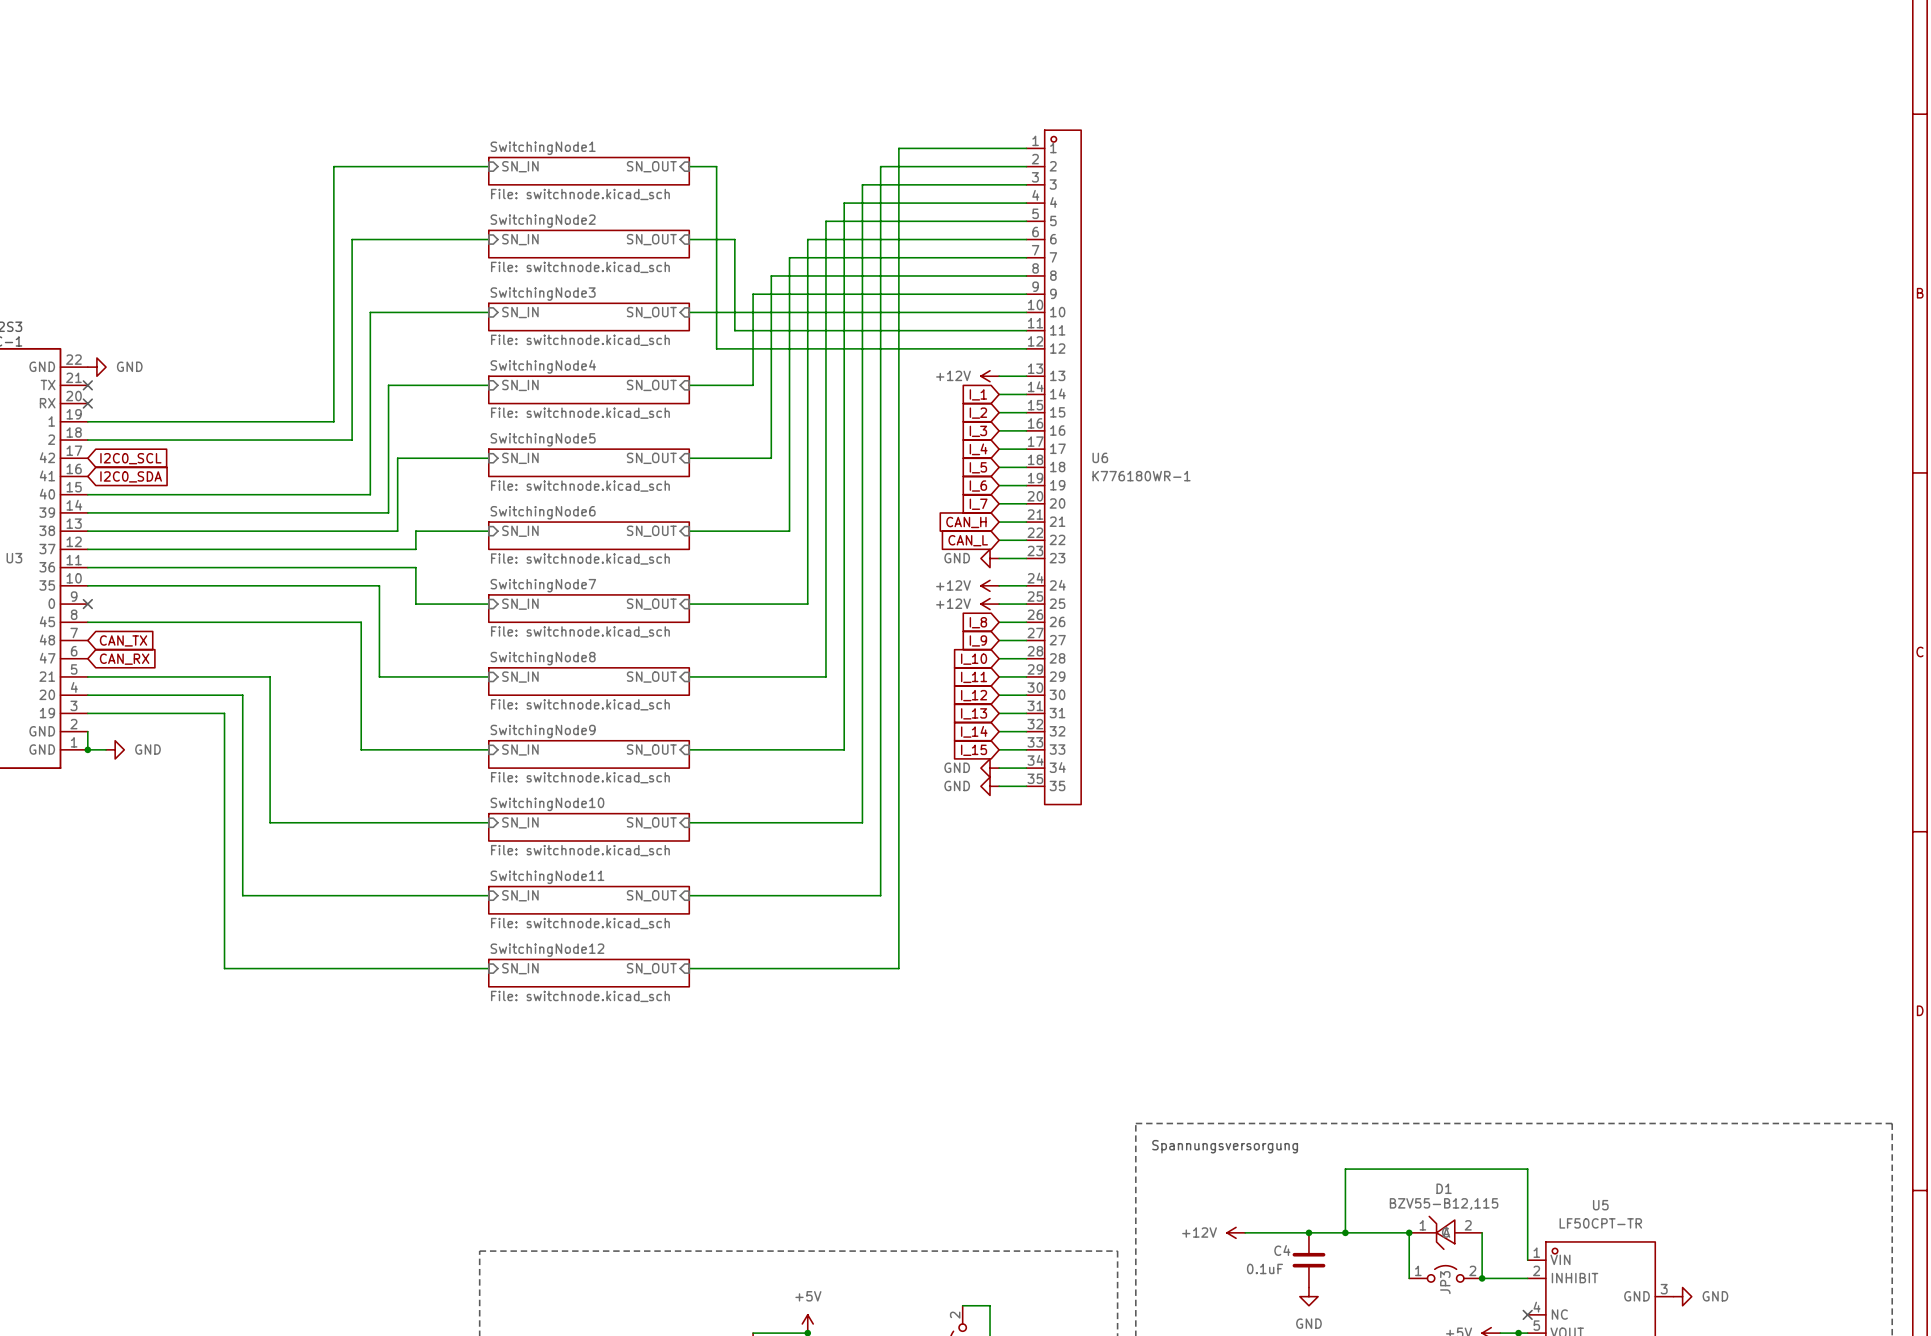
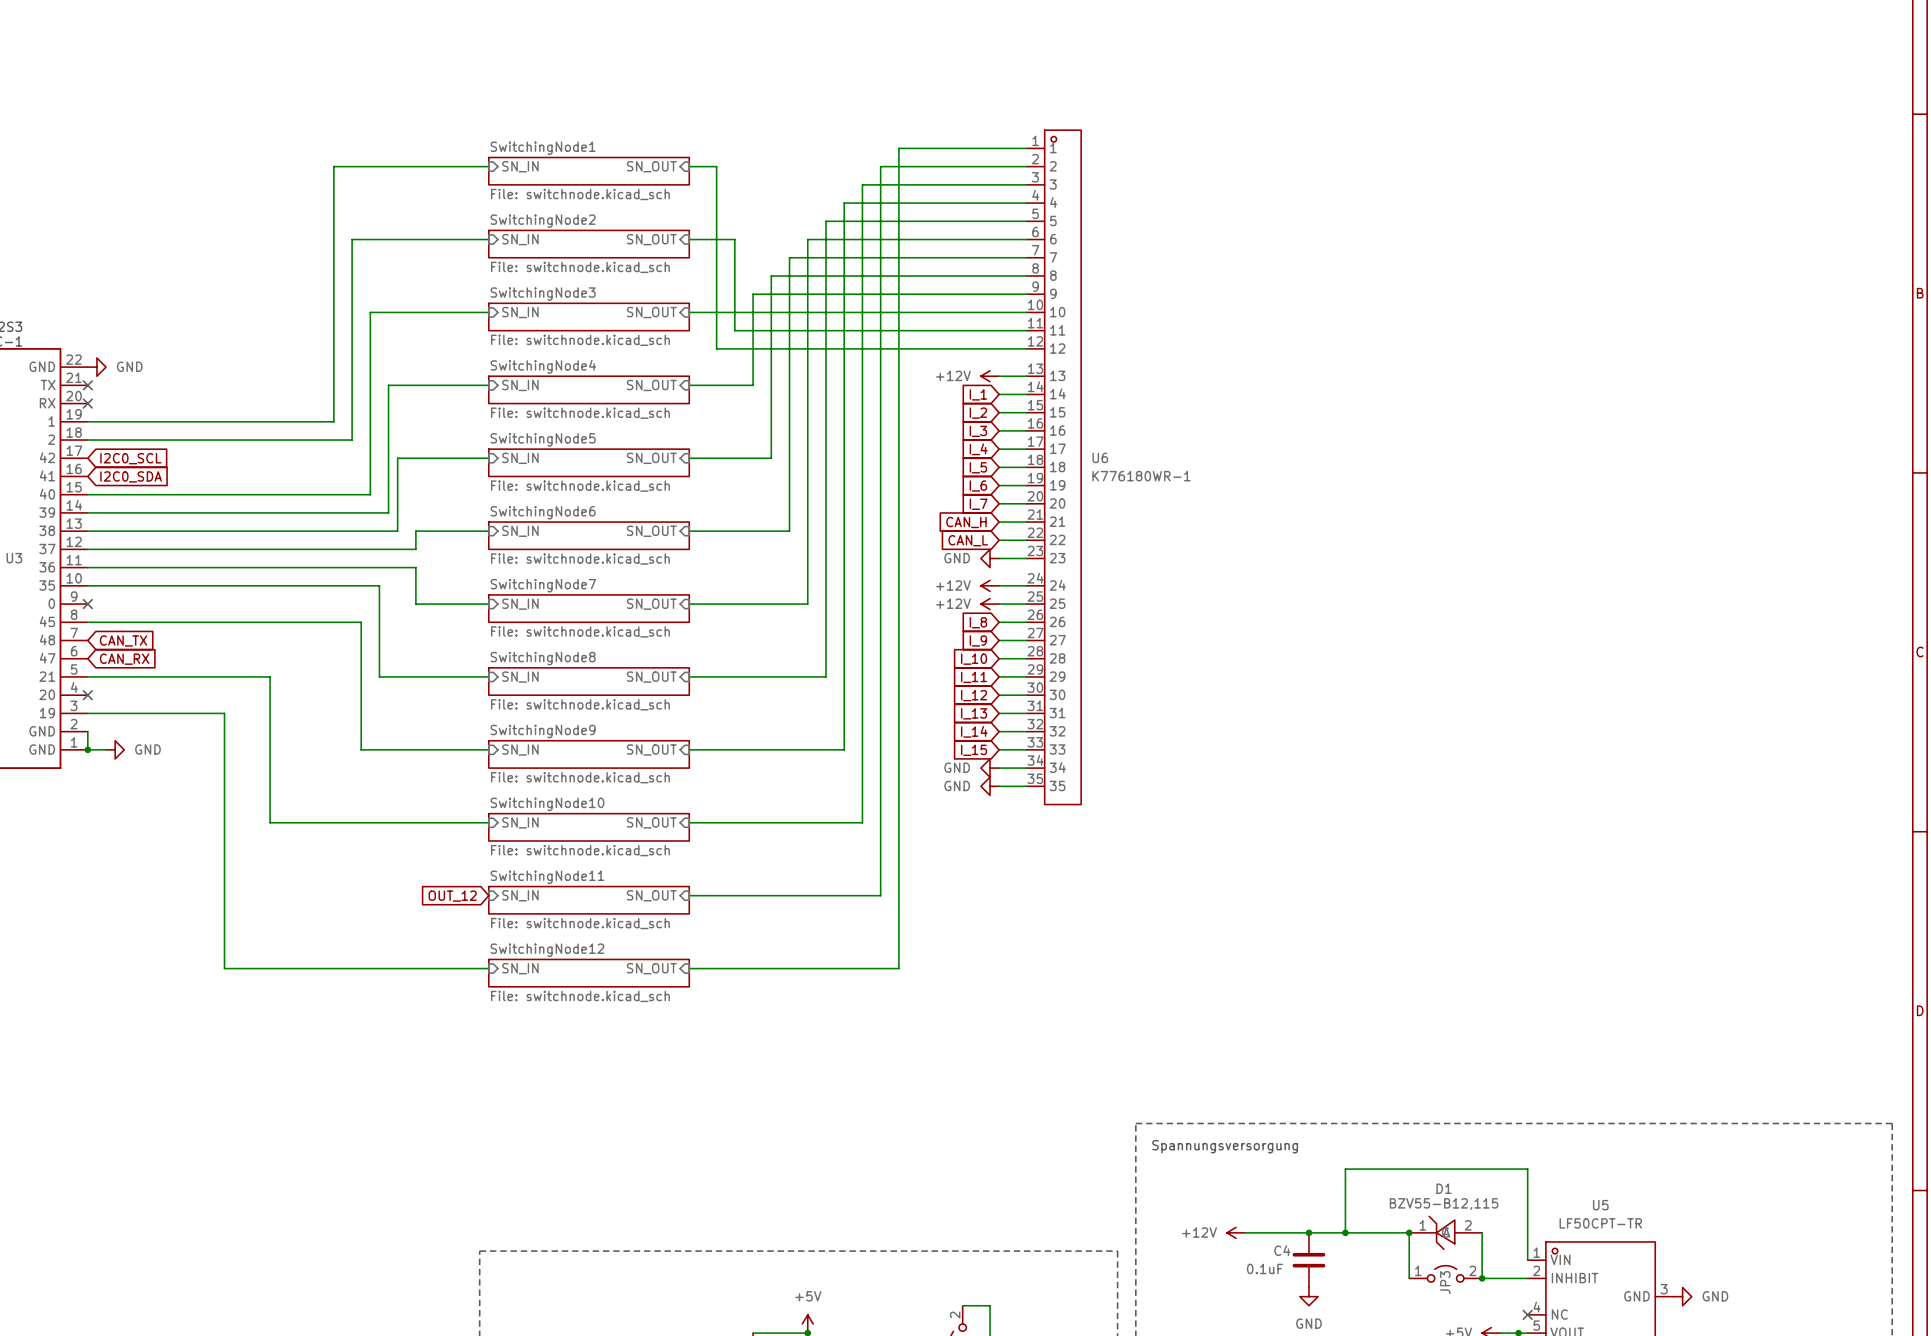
wire: (87, 695) (242, 695) (242, 895) (488, 895) -> none
no-connect mark: none -> (87, 695)
global label: none -> OUT_12 (452, 896)

